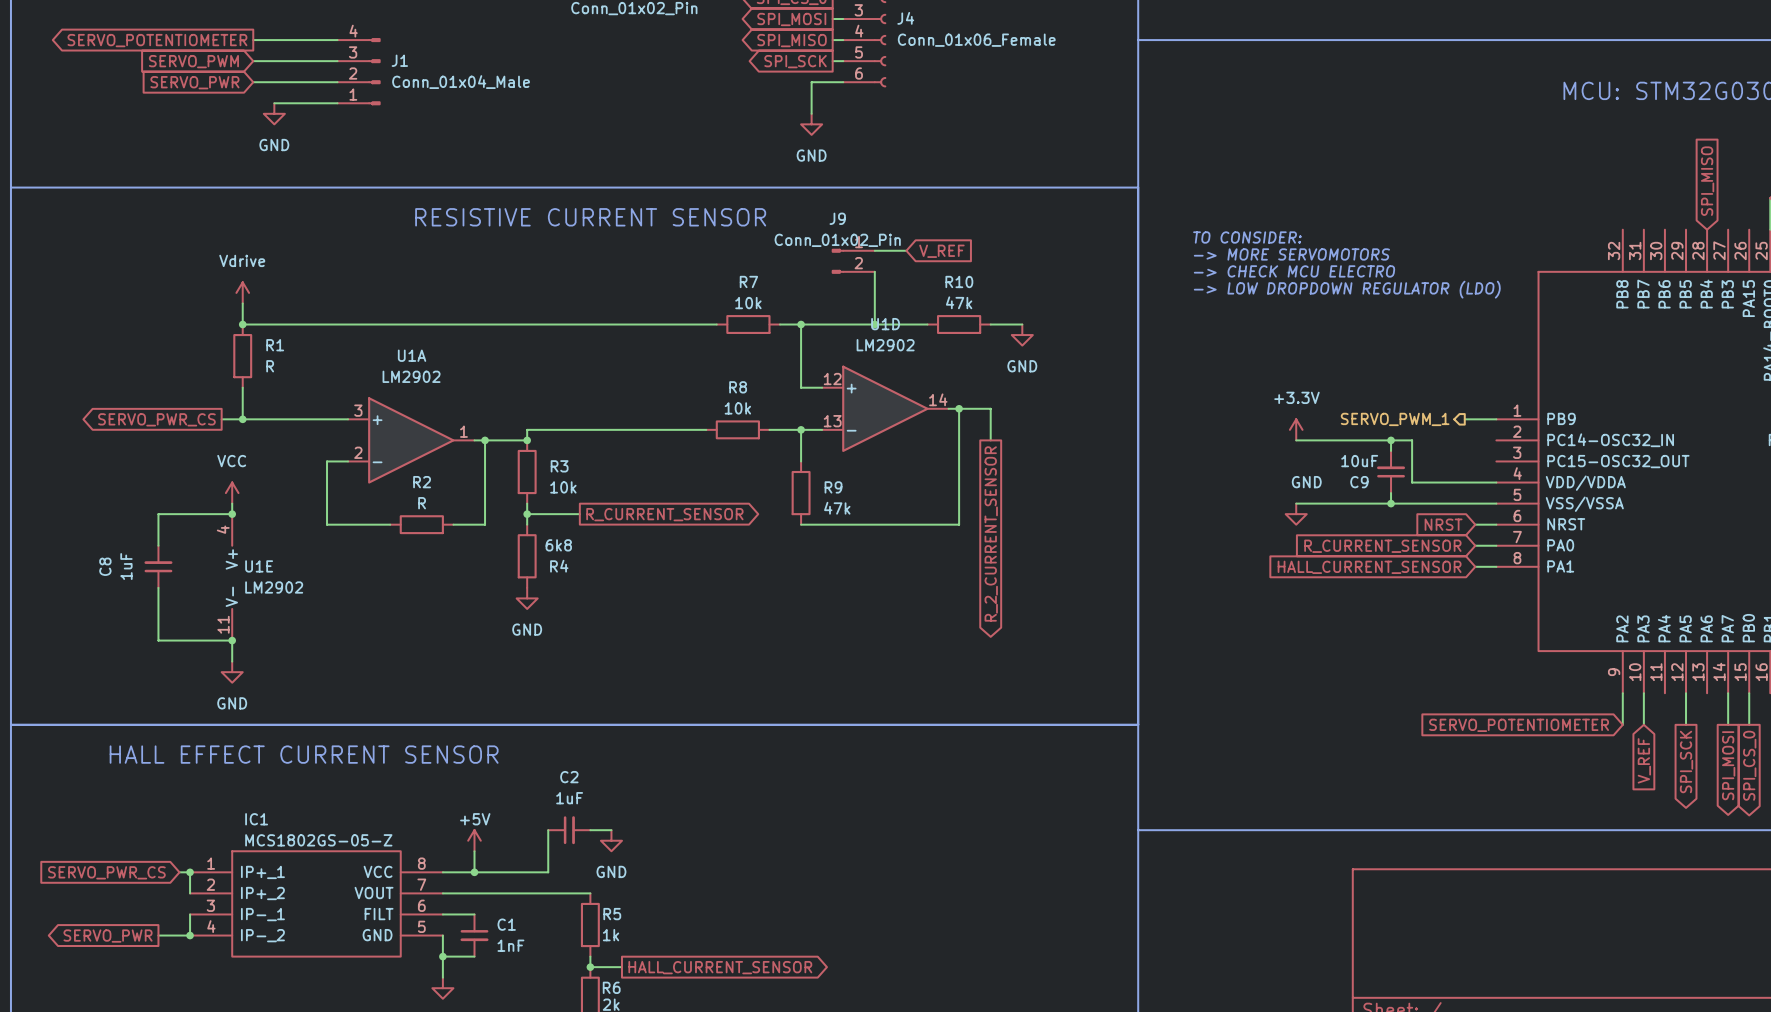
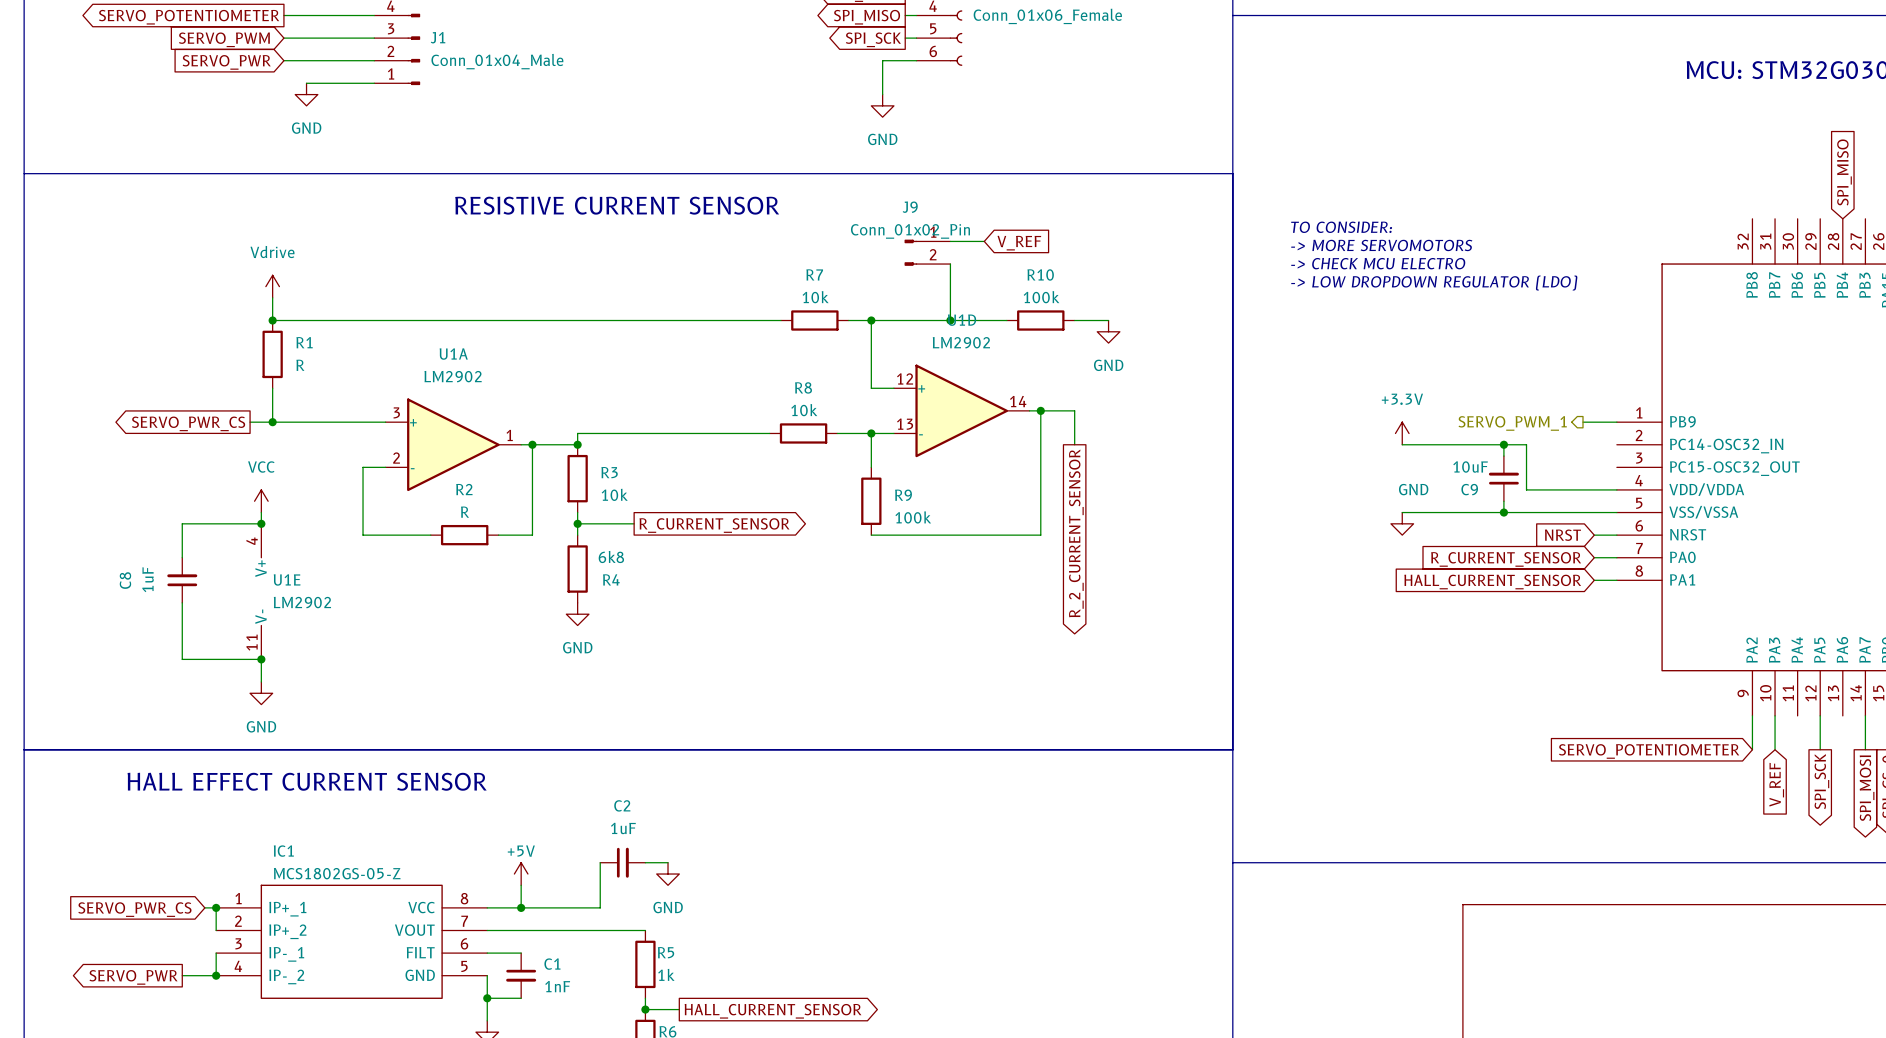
R10 value: 47k (959, 302) -> 100k (1041, 297)
R9 value: 47k (837, 508) -> 100k (913, 517)

